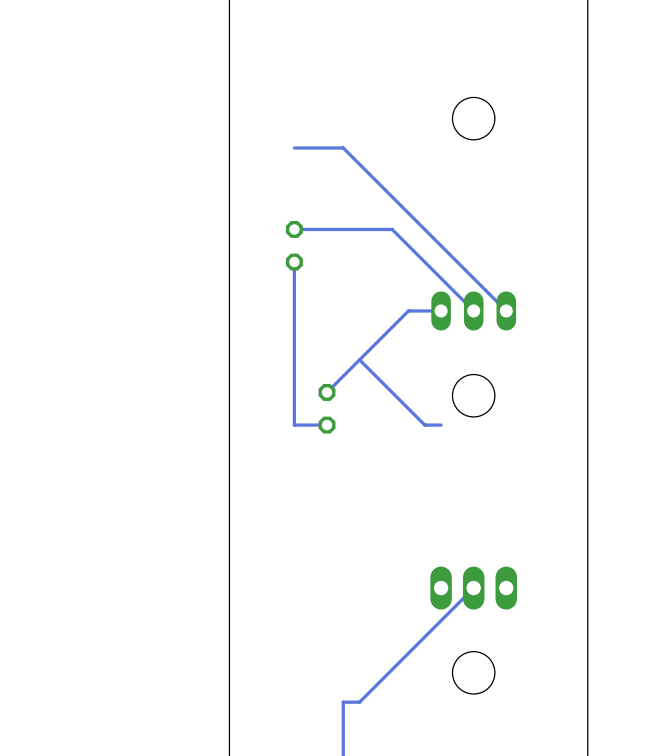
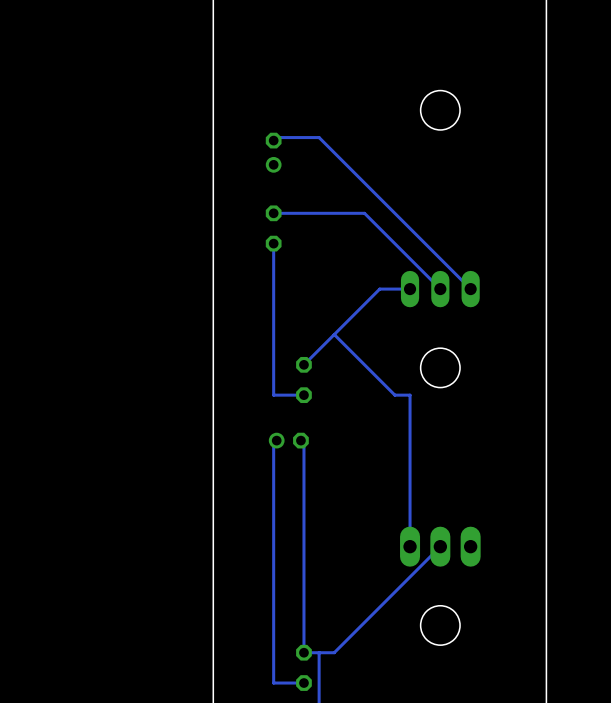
part: none -> (273, 152)
track: none -> (410, 395) (410, 546)
track: none -> (276, 440) (273, 440) (273, 683) (303, 683)
part: none -> (288, 440)
track: none -> (300, 440) (303, 440) (303, 652) (319, 652)
part: none -> (303, 667)

